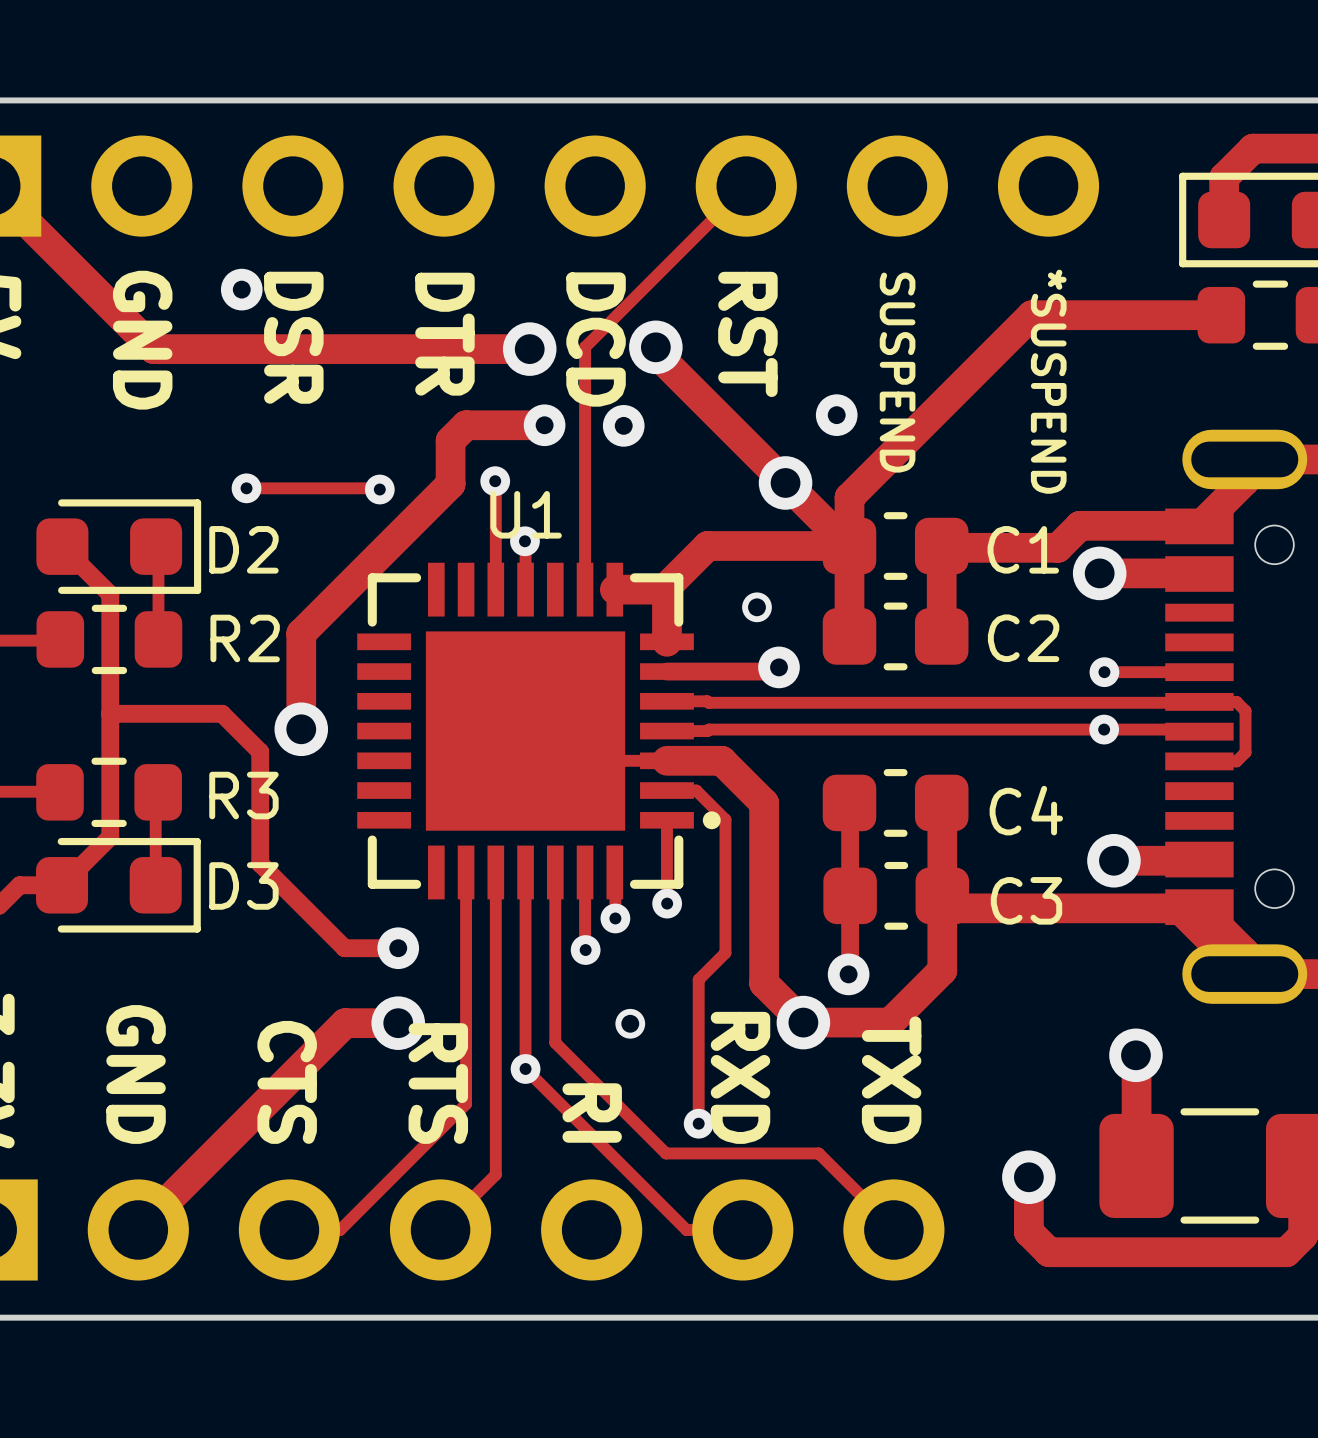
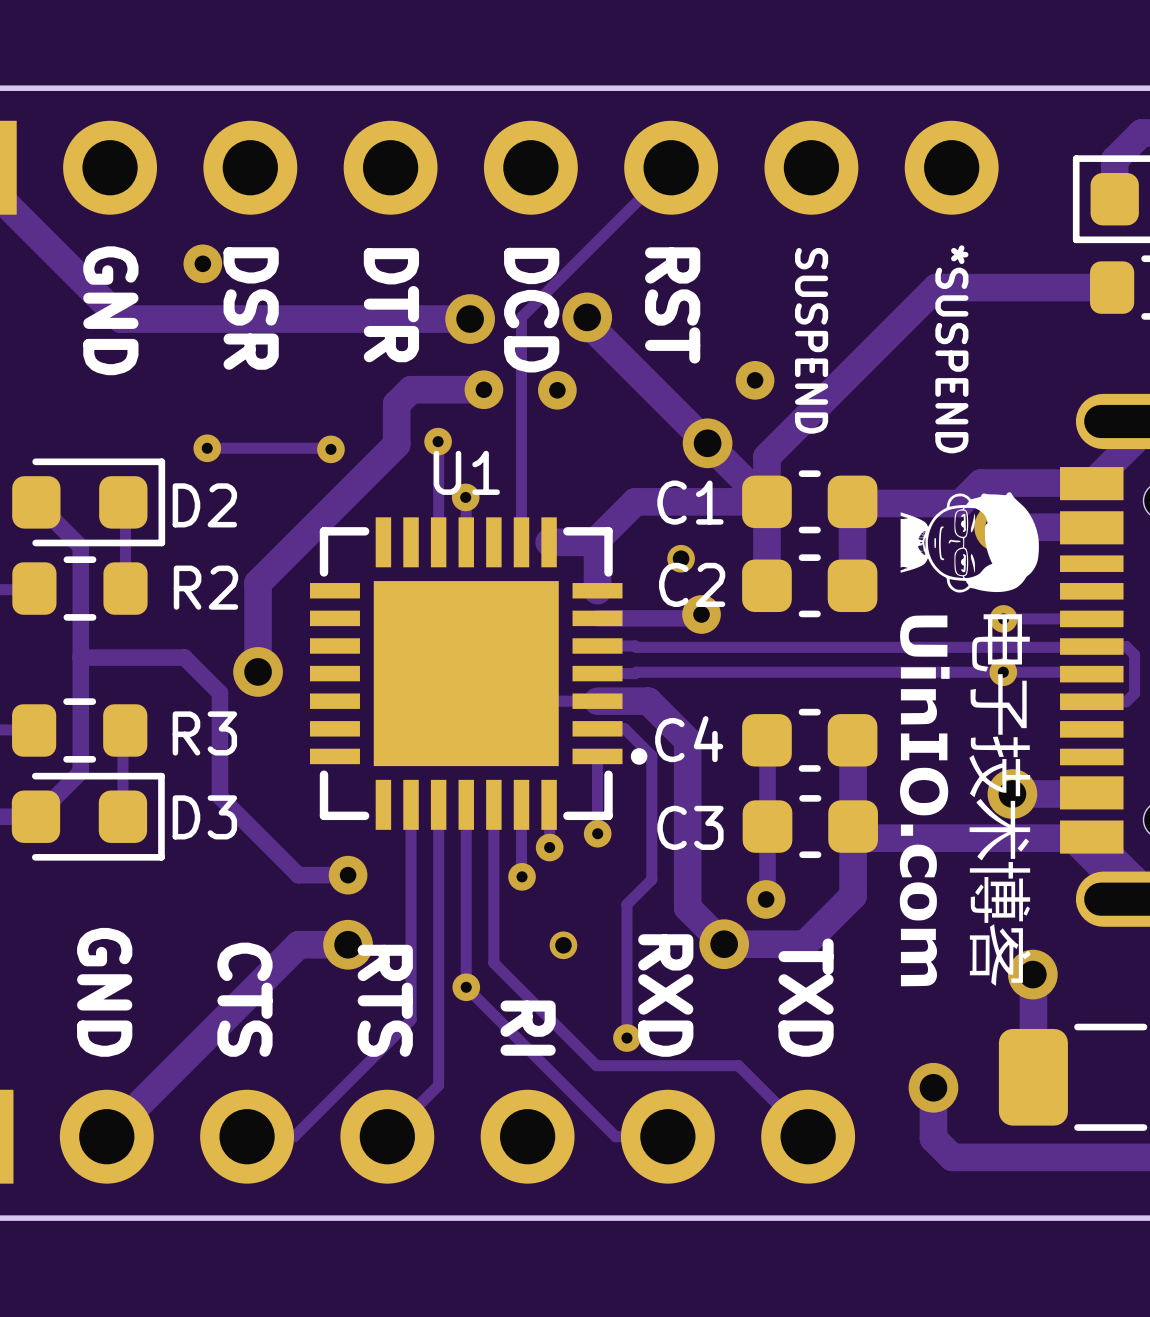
drawing: none -> [899, 492, 1039, 987]
C1 name position: C1 (1023, 549) -> C1 (690, 502)
C2 name position: C2 (1023, 638) -> C2 (692, 584)
C4 name position: C4 (1026, 810) -> C4 (689, 739)
C3 name position: C3 (1026, 900) -> C3 (690, 827)

